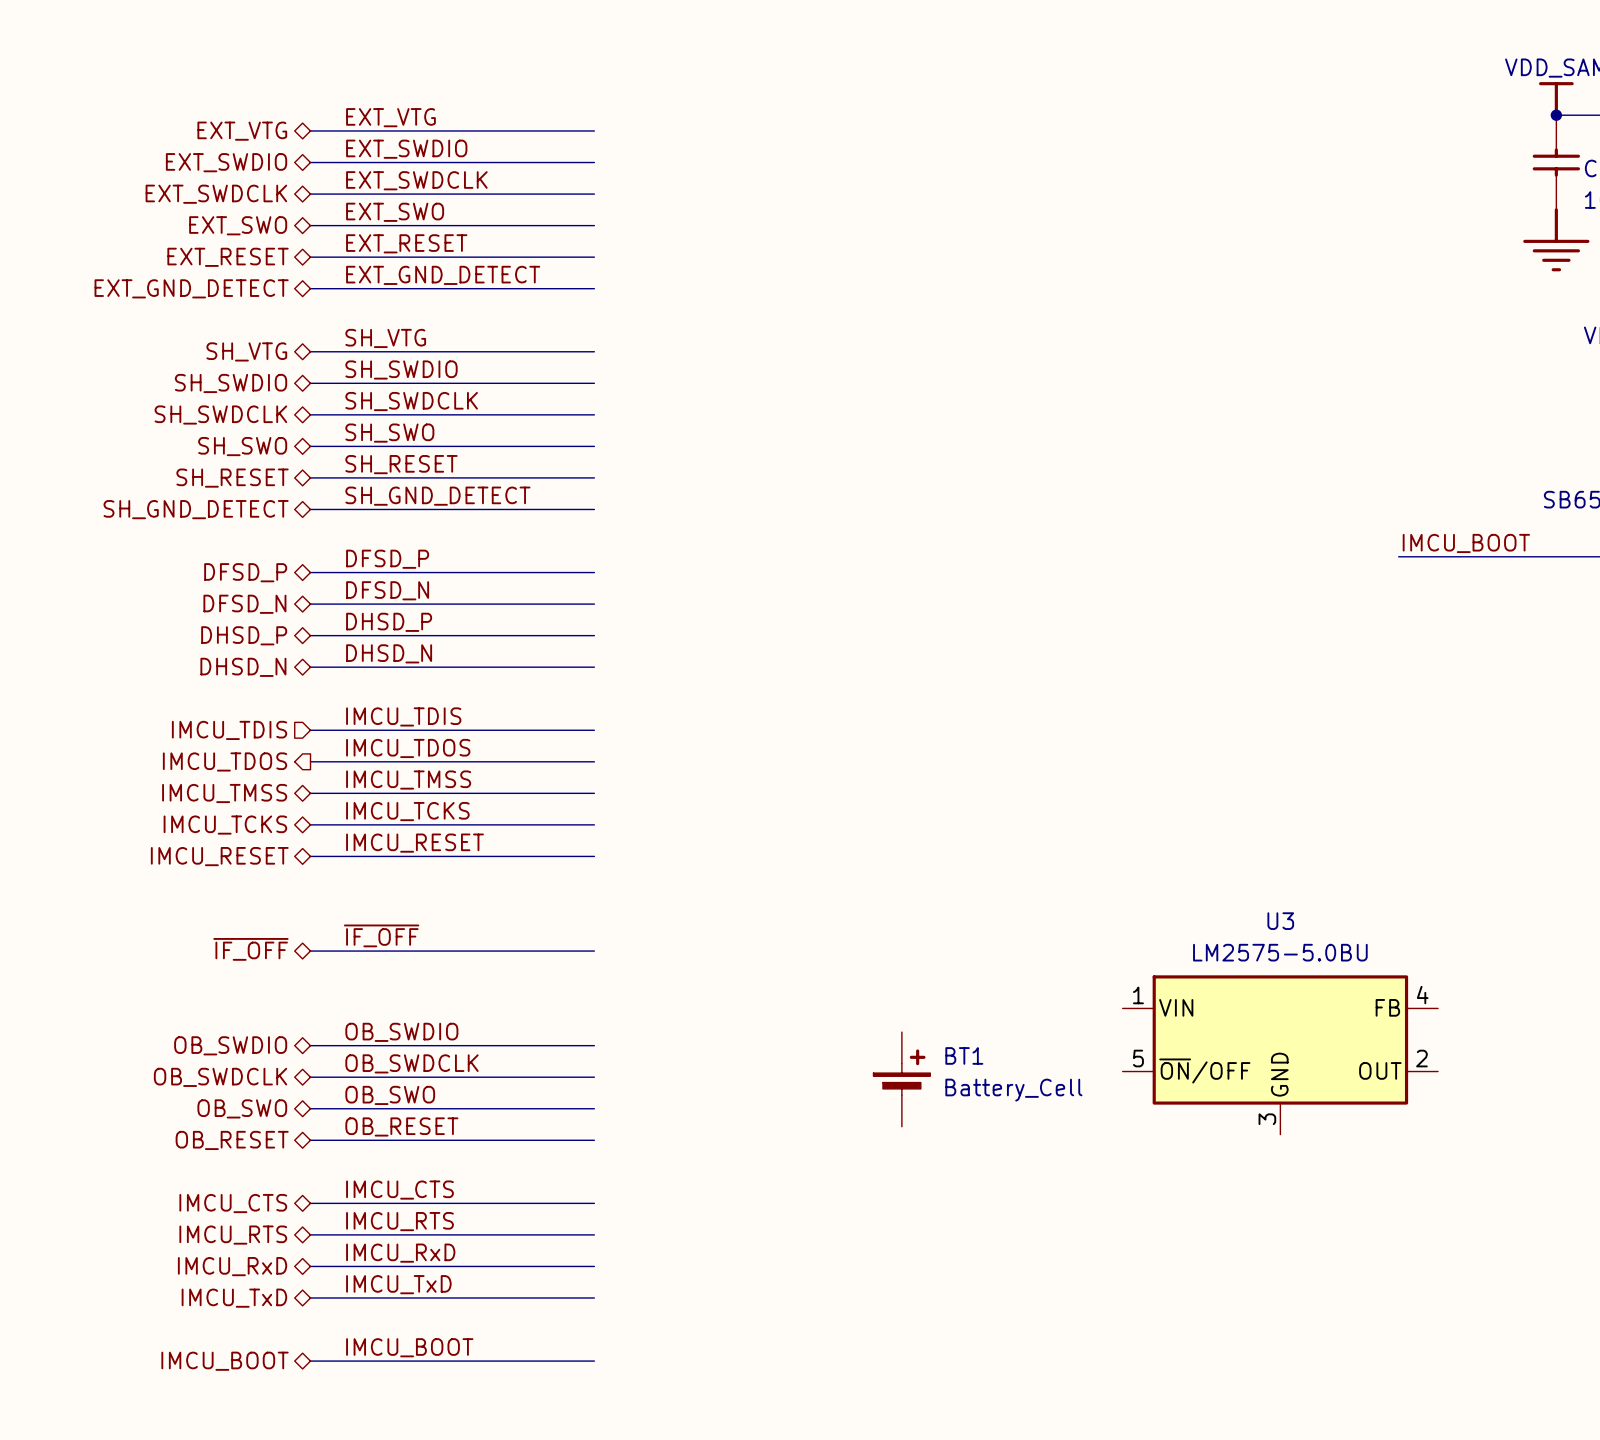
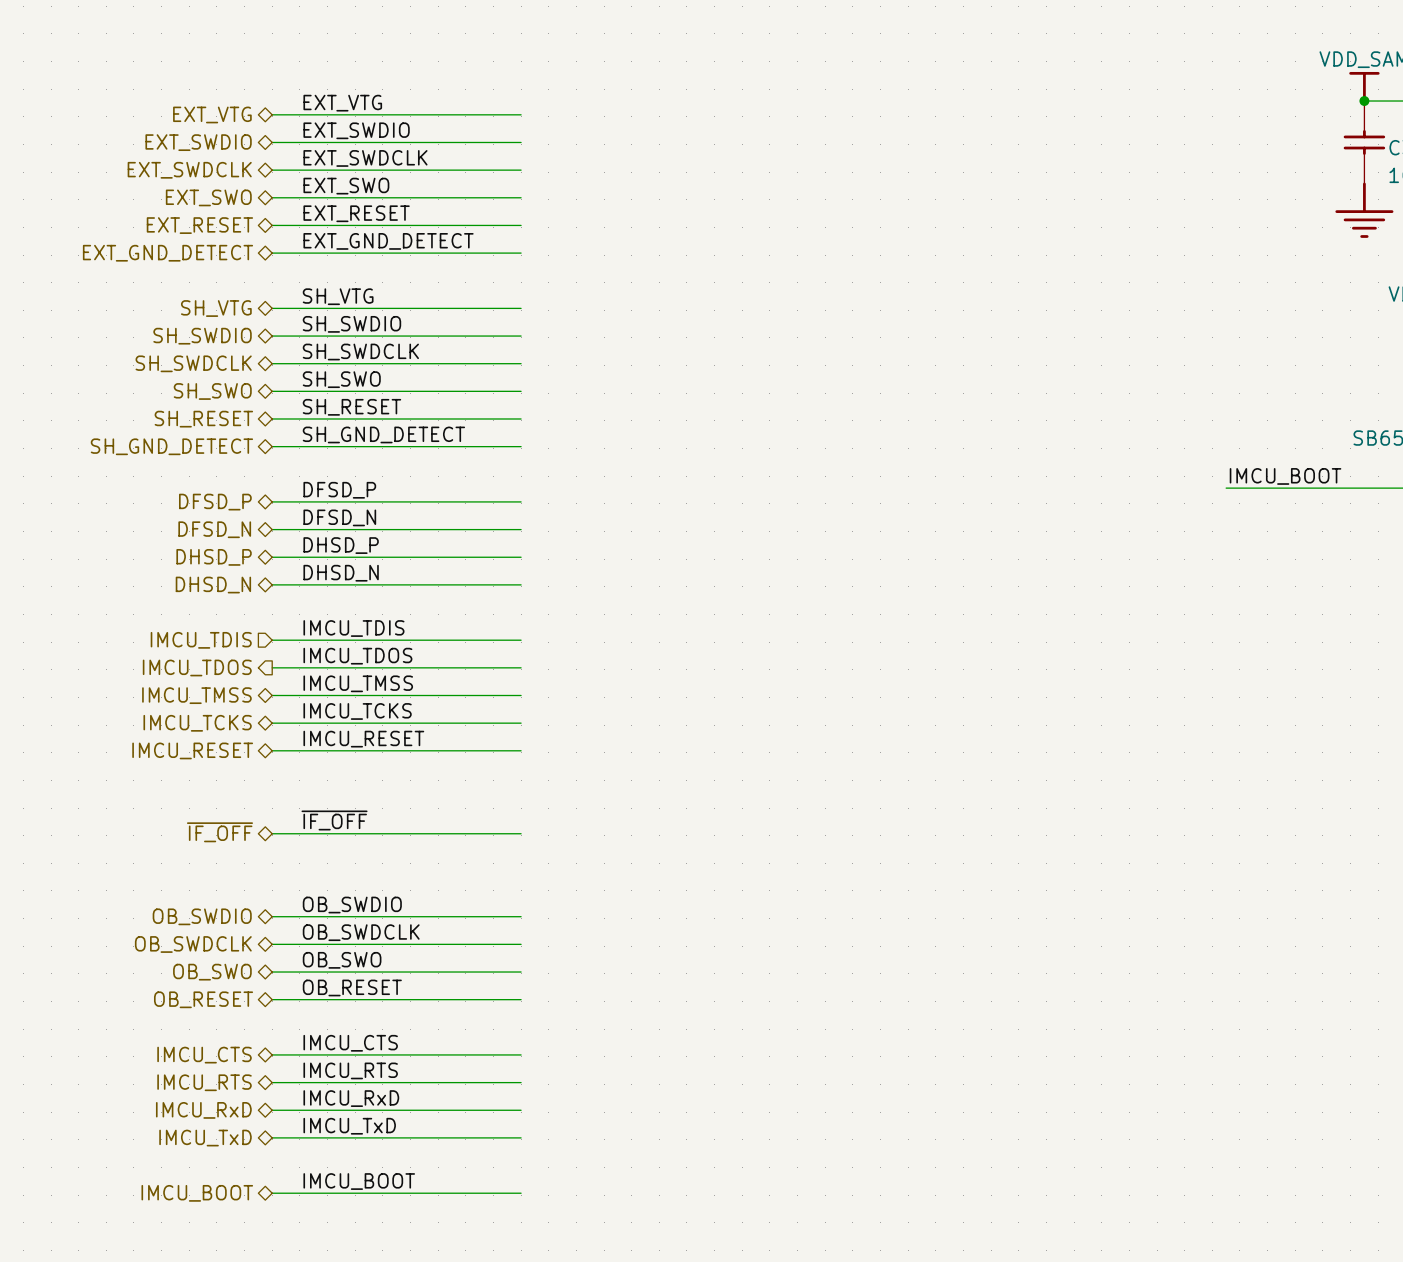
U3: LM2575-5.0BU (1280, 1054) -> none
BT1: Battery_Cell (901, 1079) -> none

